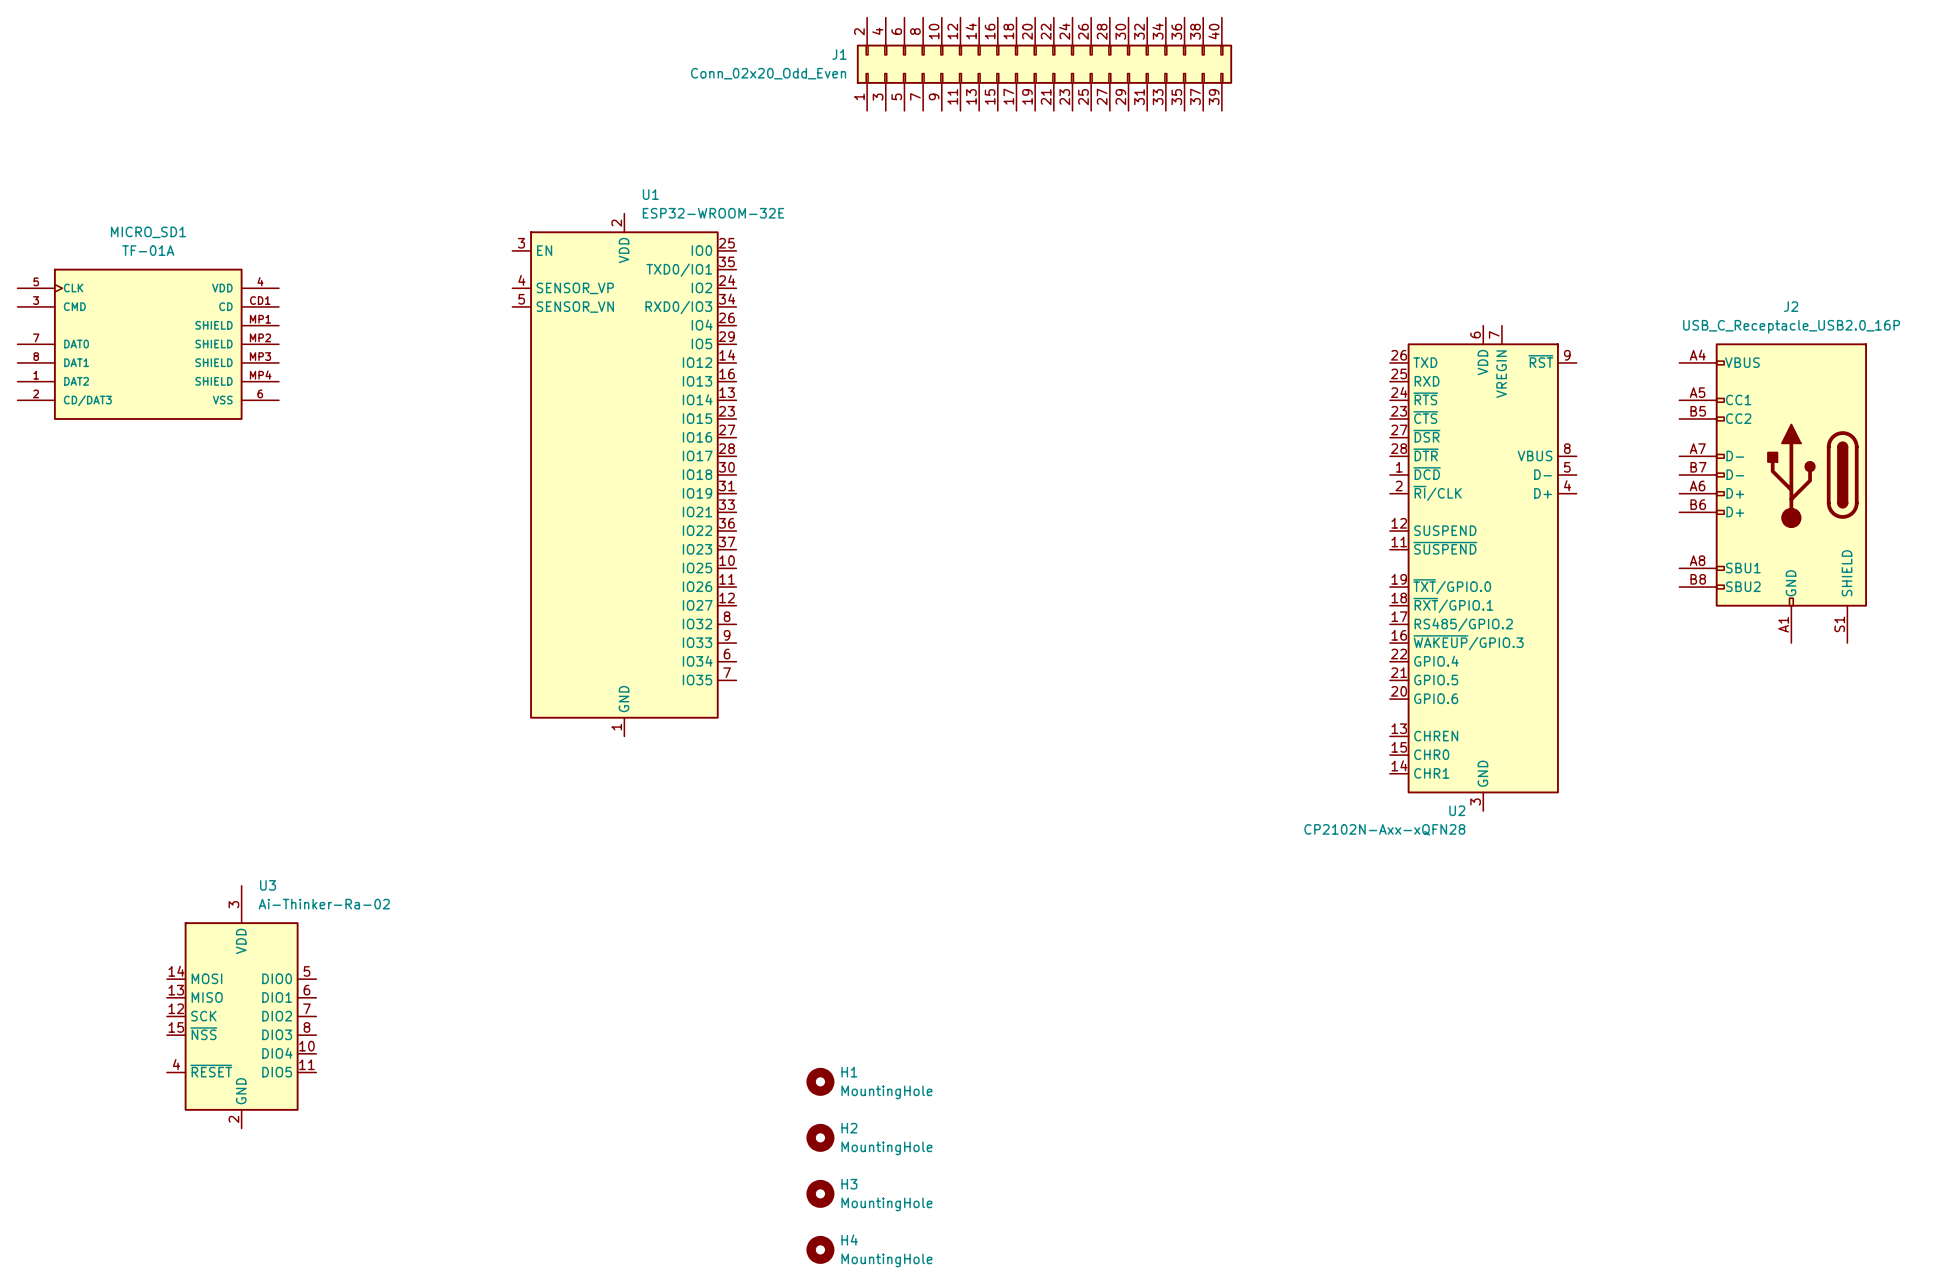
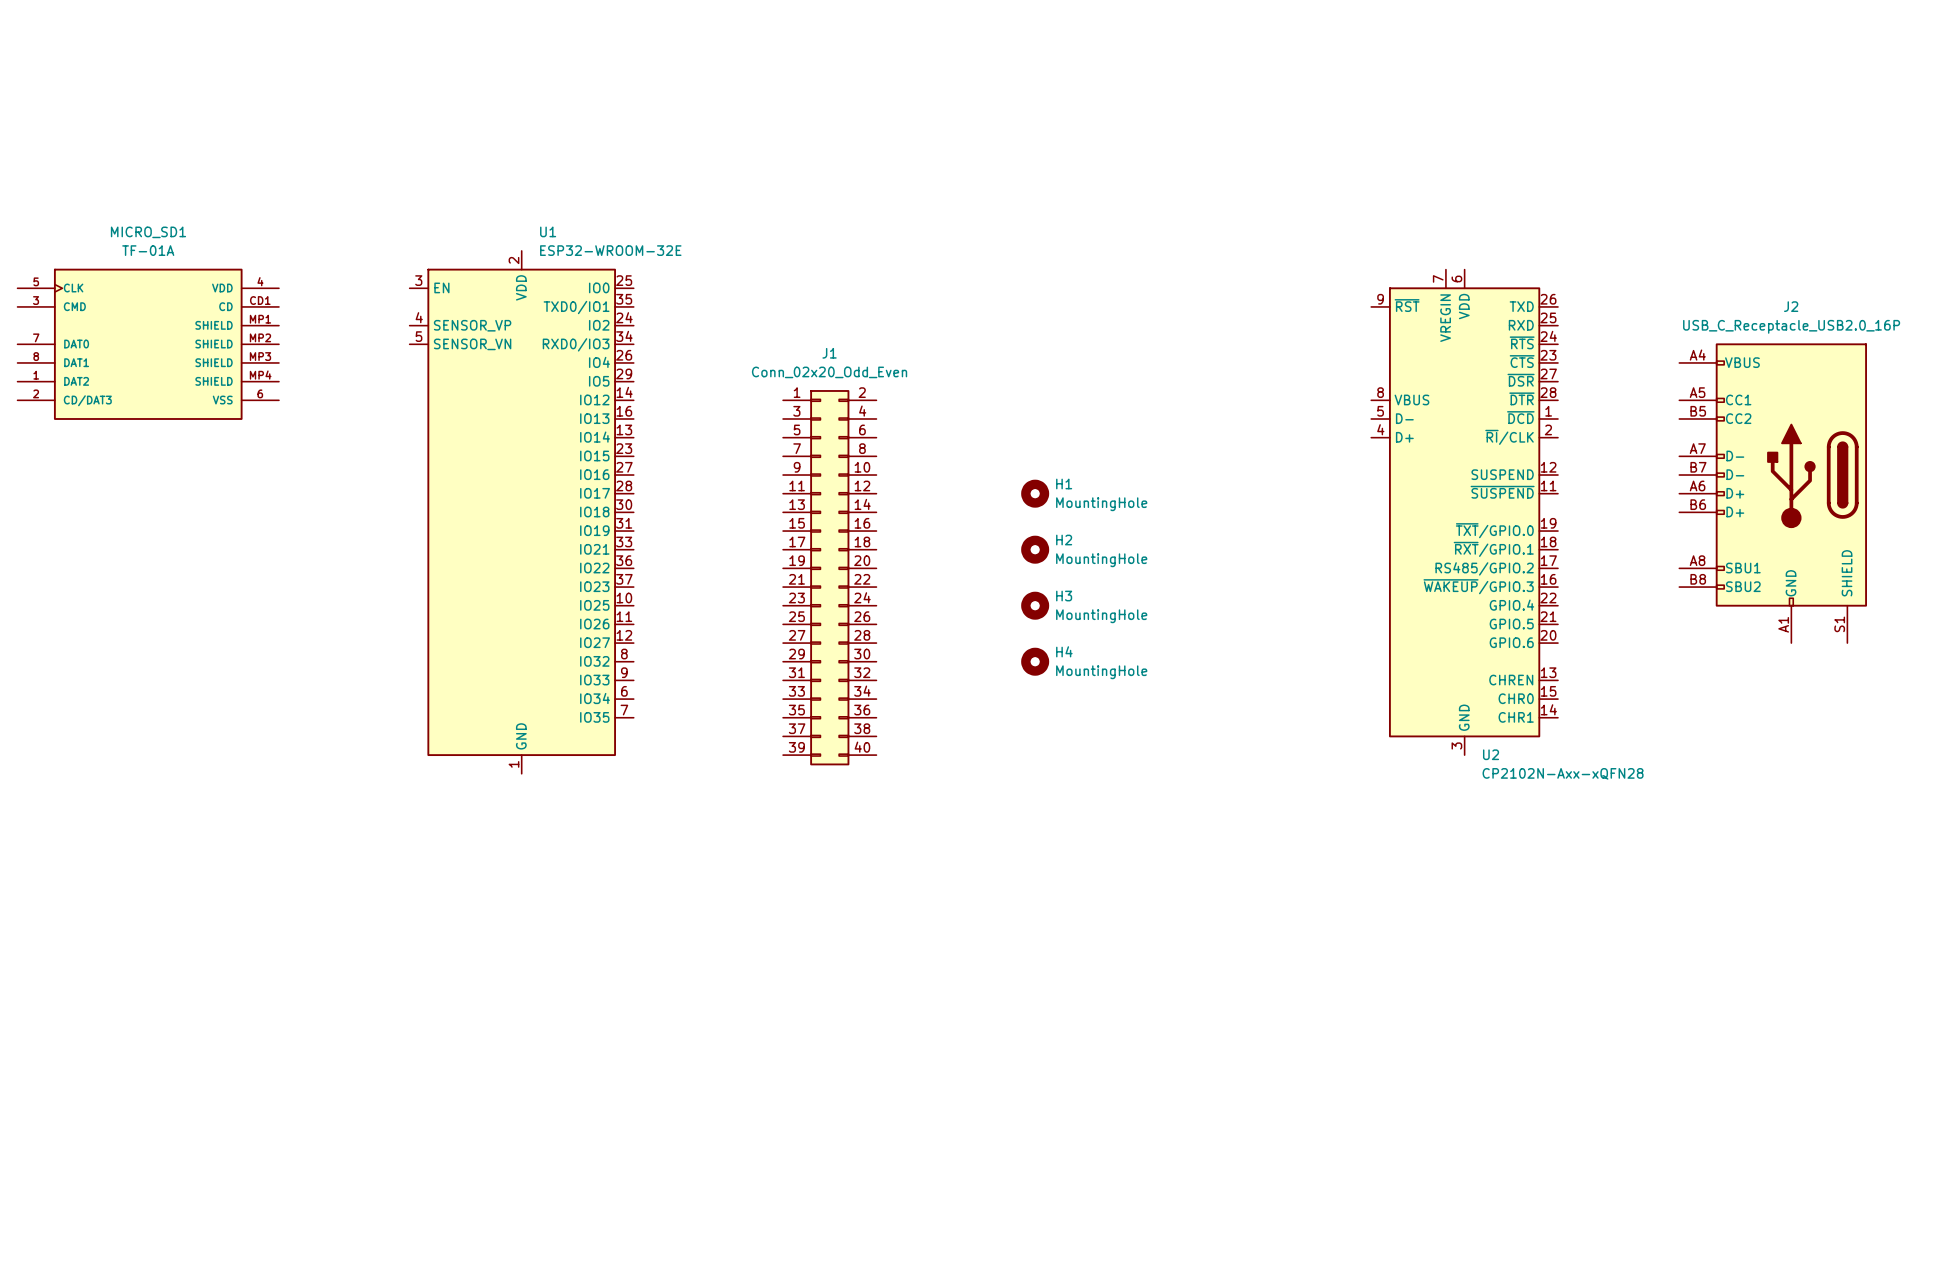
J1 name position: J1 (839, 54) -> J1 (829, 353)
J1 rotation: 0° (1044, 64) -> 90° clockwise (829, 577)
J1 position: (1044, 64) -> (829, 577)
J1 value position: Conn_02x20_Odd_Even (768, 73) -> Conn_02x20_Odd_Even (829, 372)
U1 position: (624, 475) -> (521, 512)
U2 flip: as is (1483, 568) -> left-right (1464, 512)
U3: Ai-Thinker-Ra-02 (241, 1007) -> none
H1 position: (820, 1081) -> (1035, 493)
H2 position: (820, 1137) -> (1035, 549)
H3 position: (820, 1193) -> (1035, 605)
H4 position: (820, 1249) -> (1035, 661)

